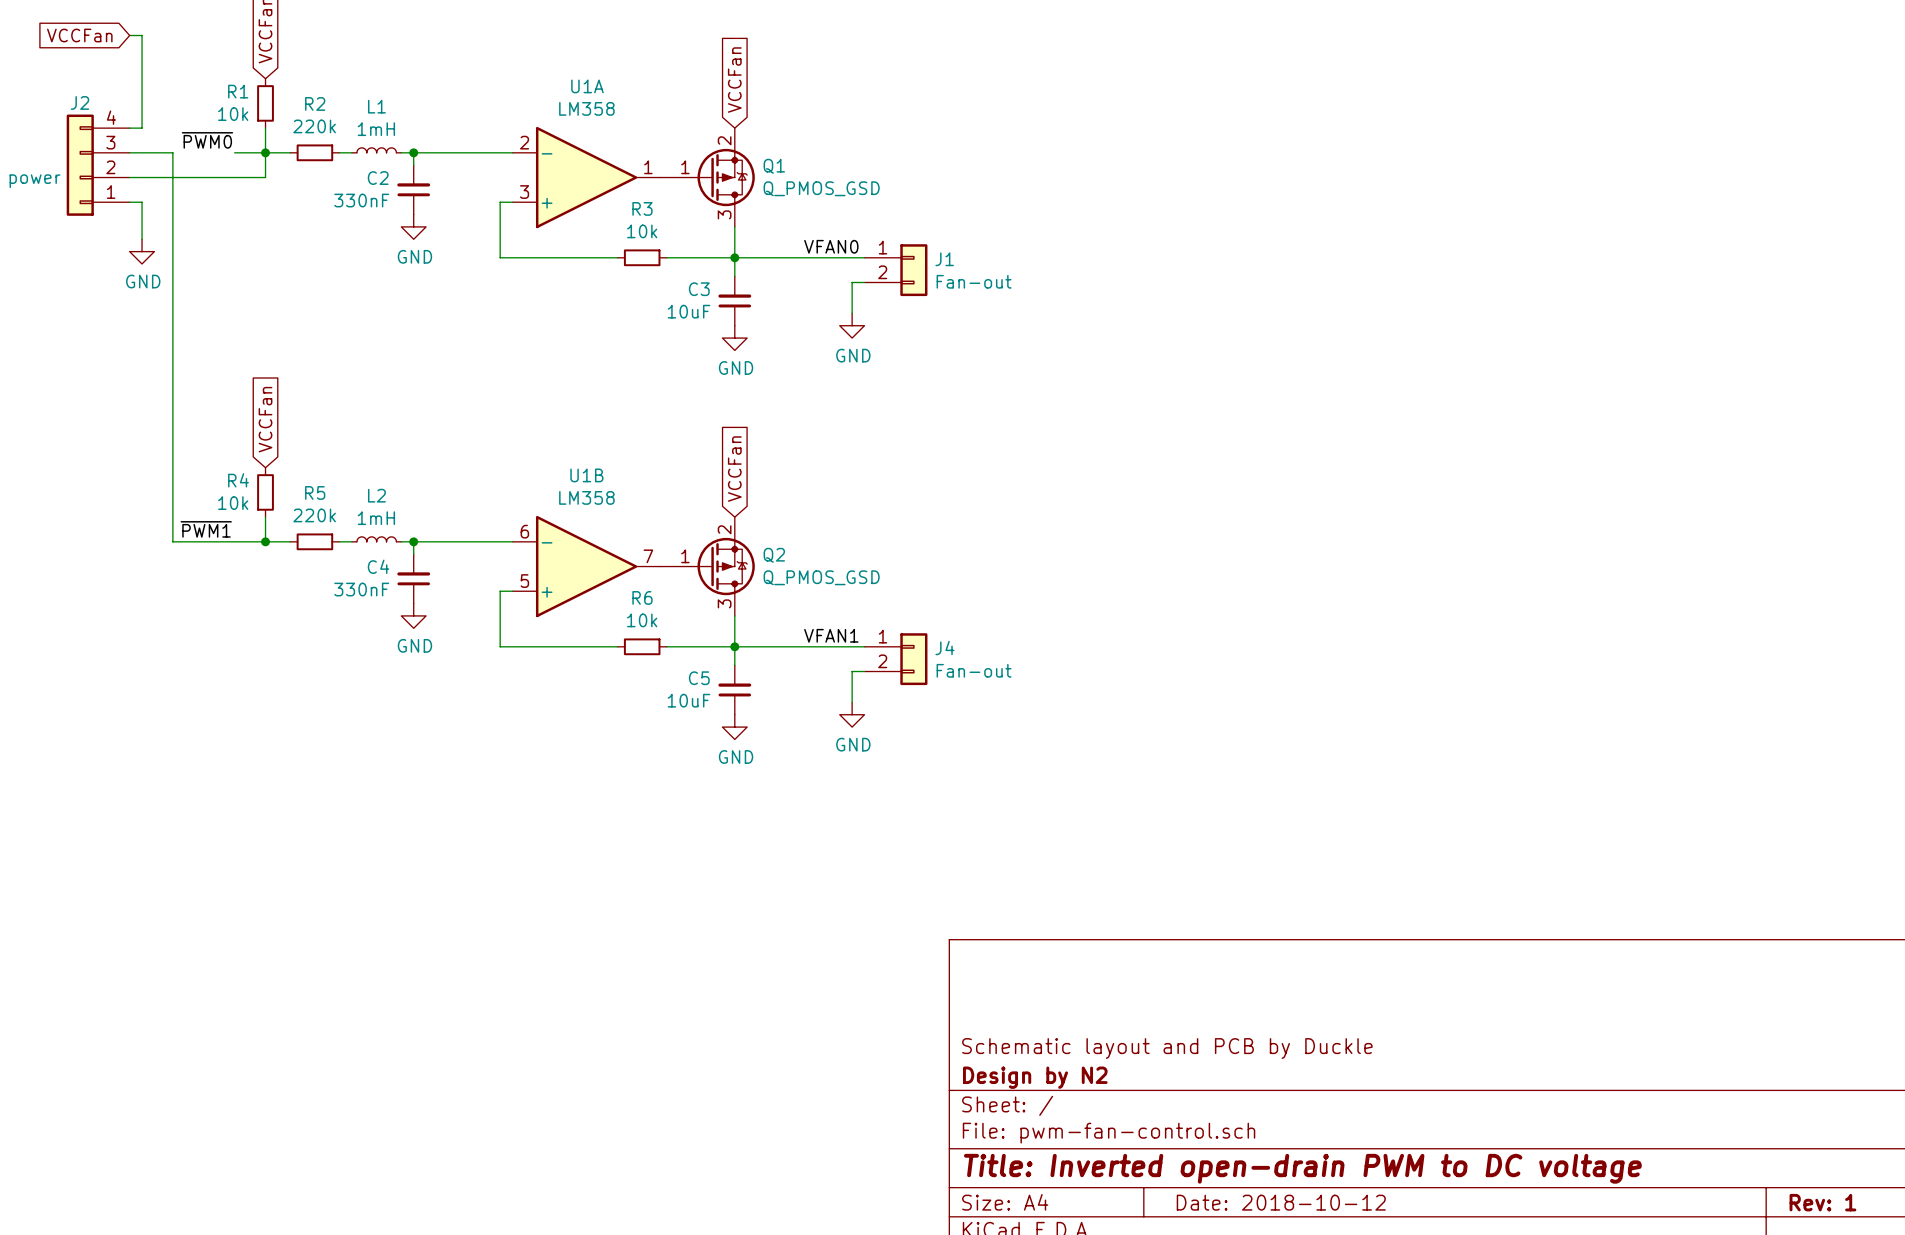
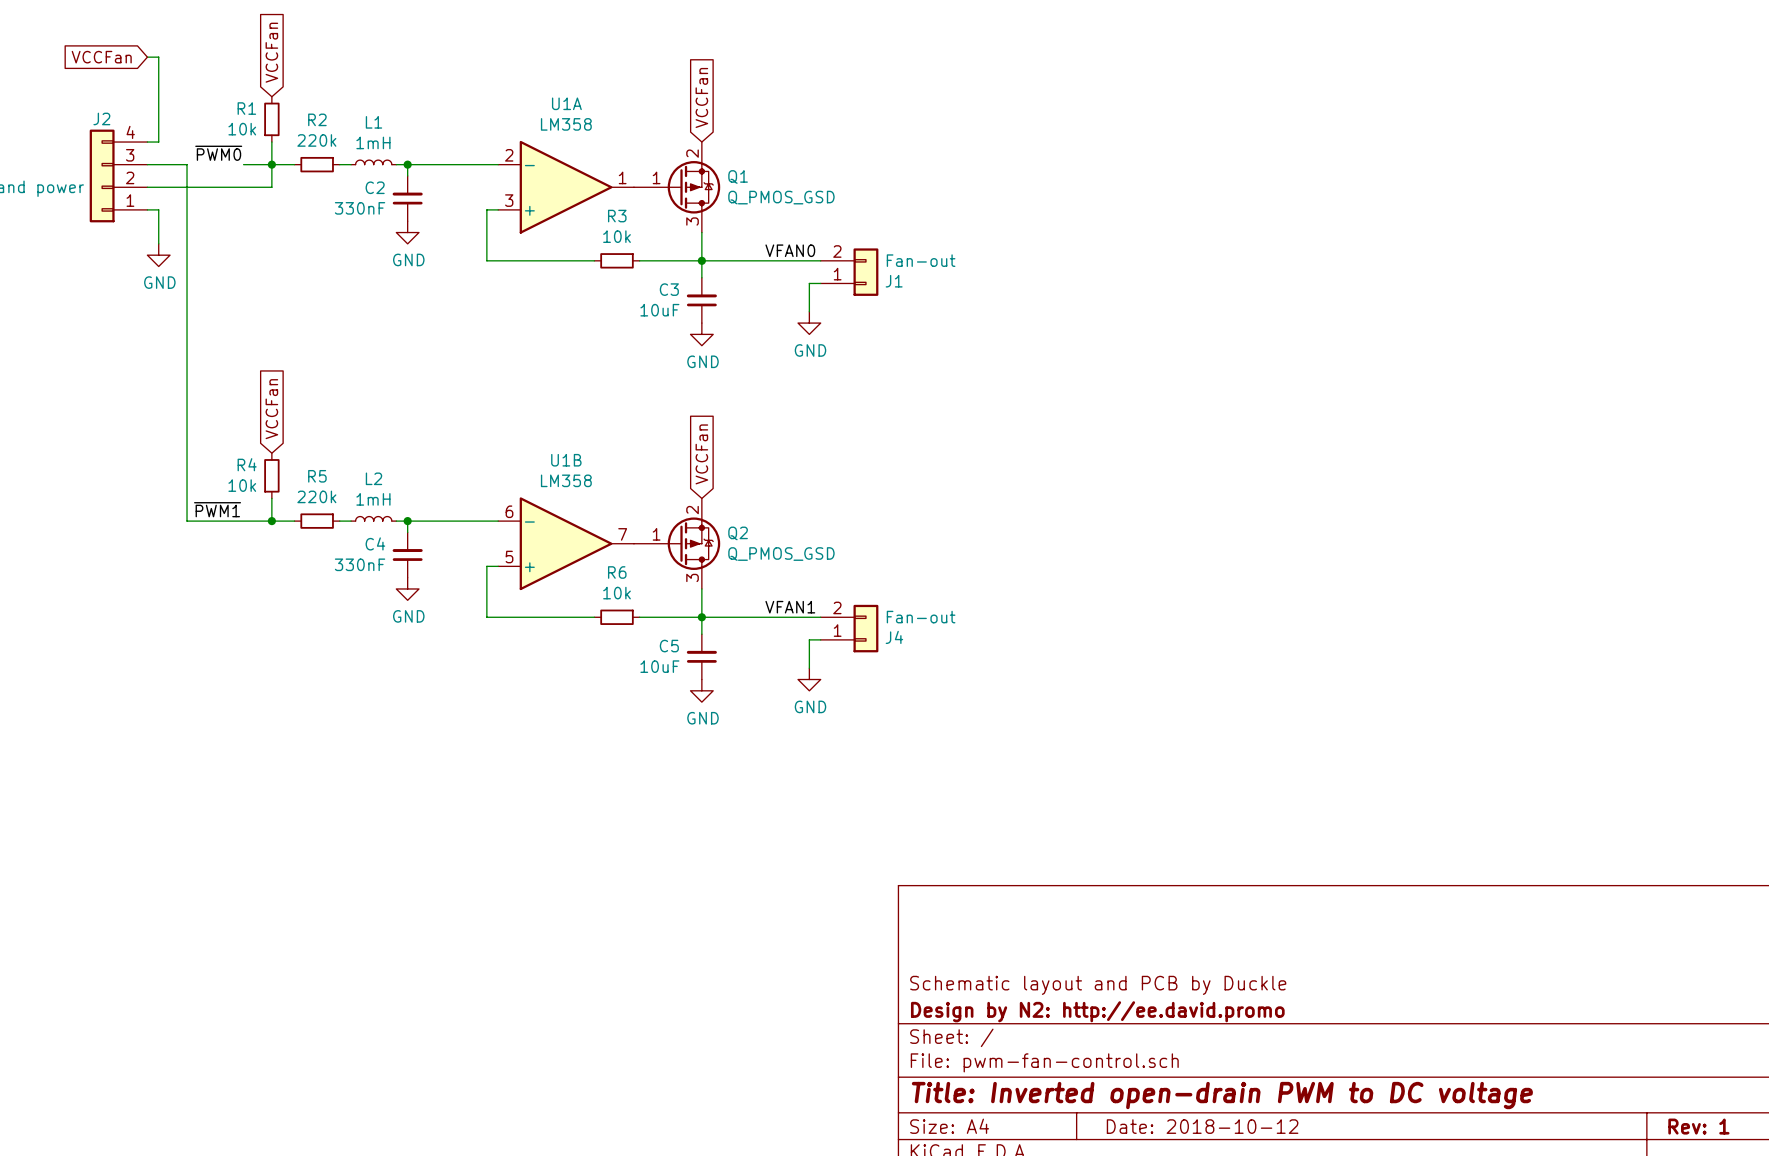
J1 flip: as is (913, 270) -> up-down (865, 272)
J4 flip: as is (913, 659) -> up-down (865, 628)
title block: Design by N2 (1035, 1077) -> Design by N2: http://ee.david.promo (1097, 1011)

